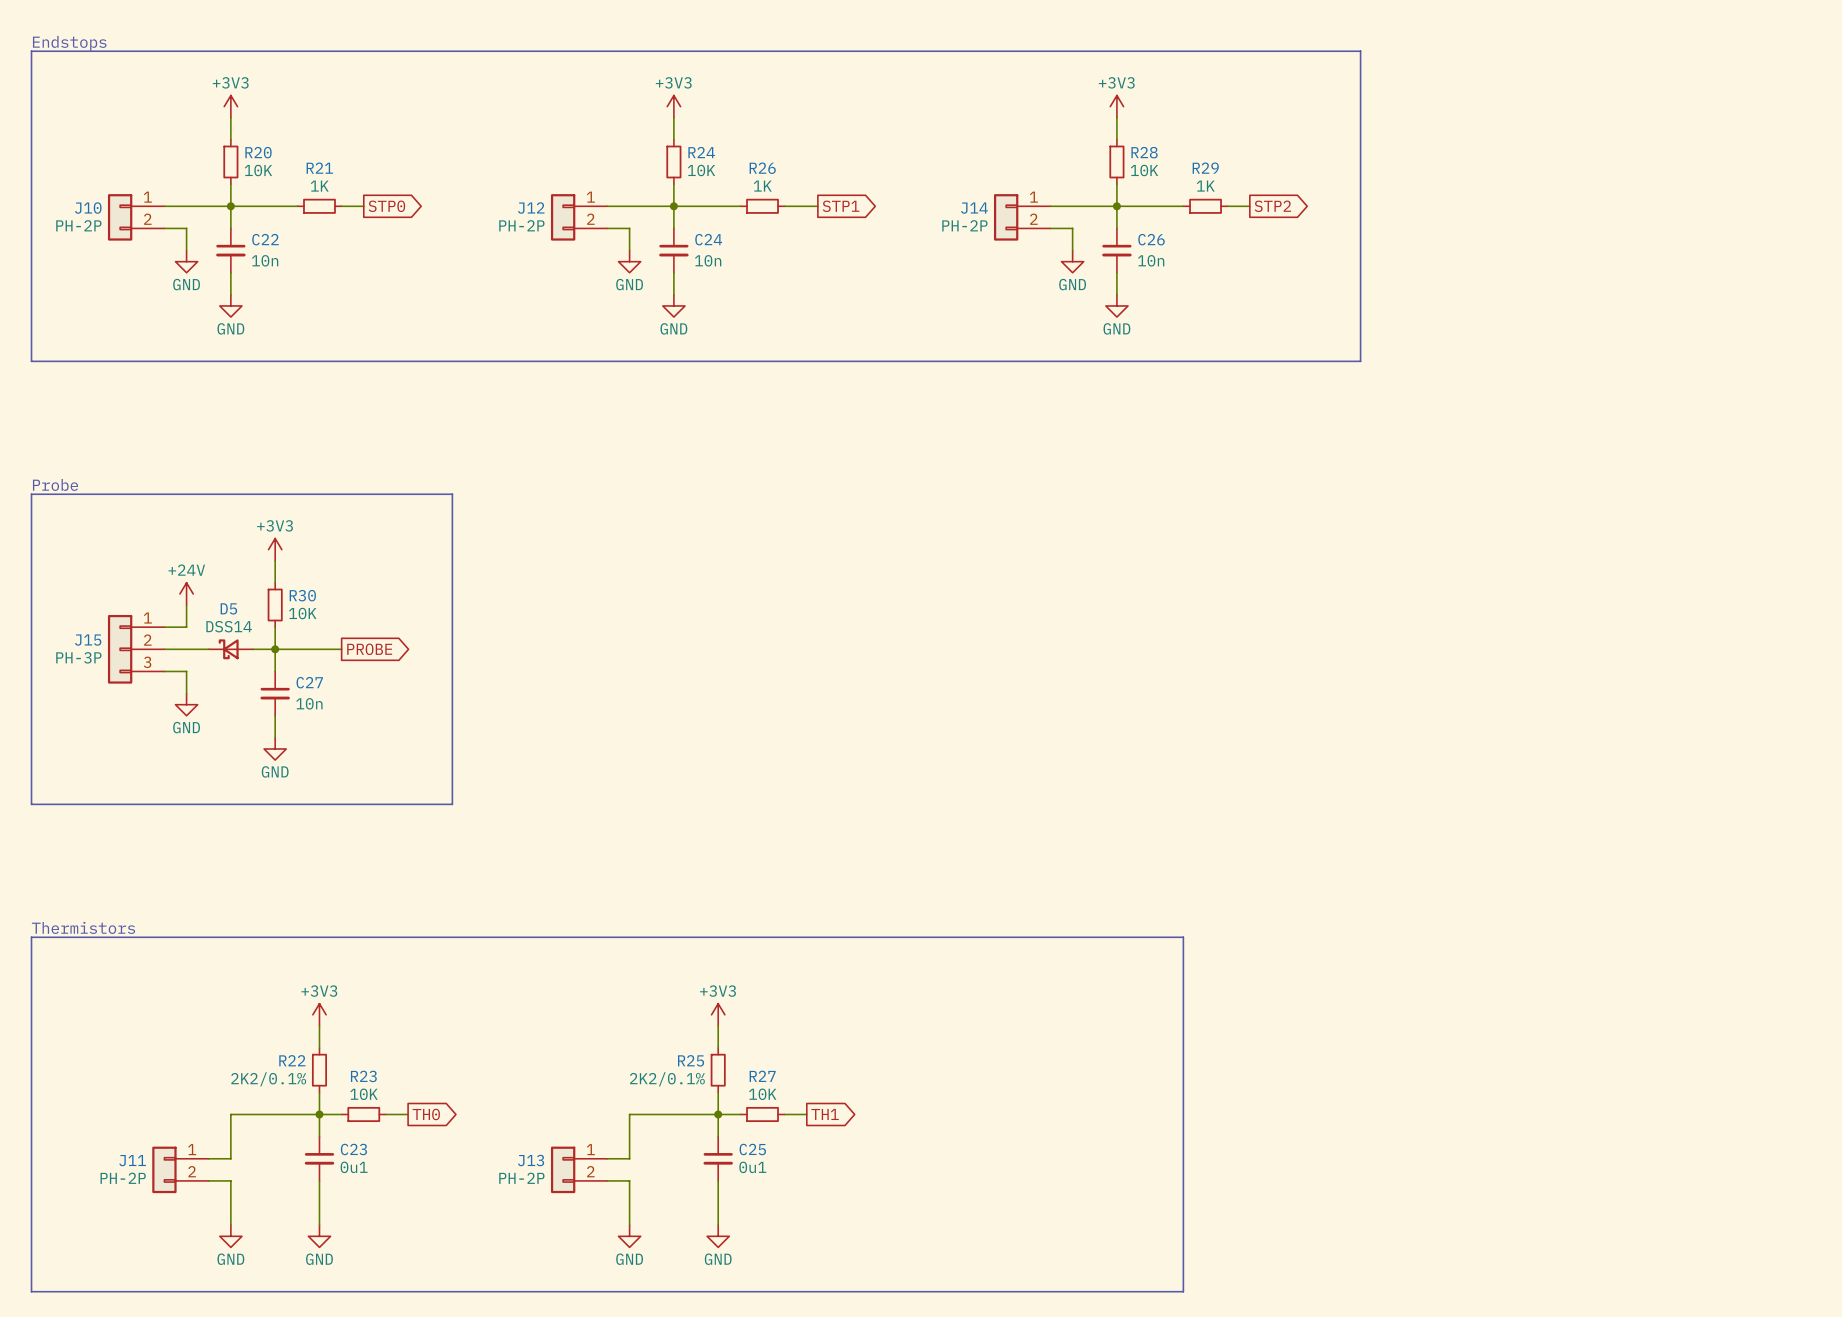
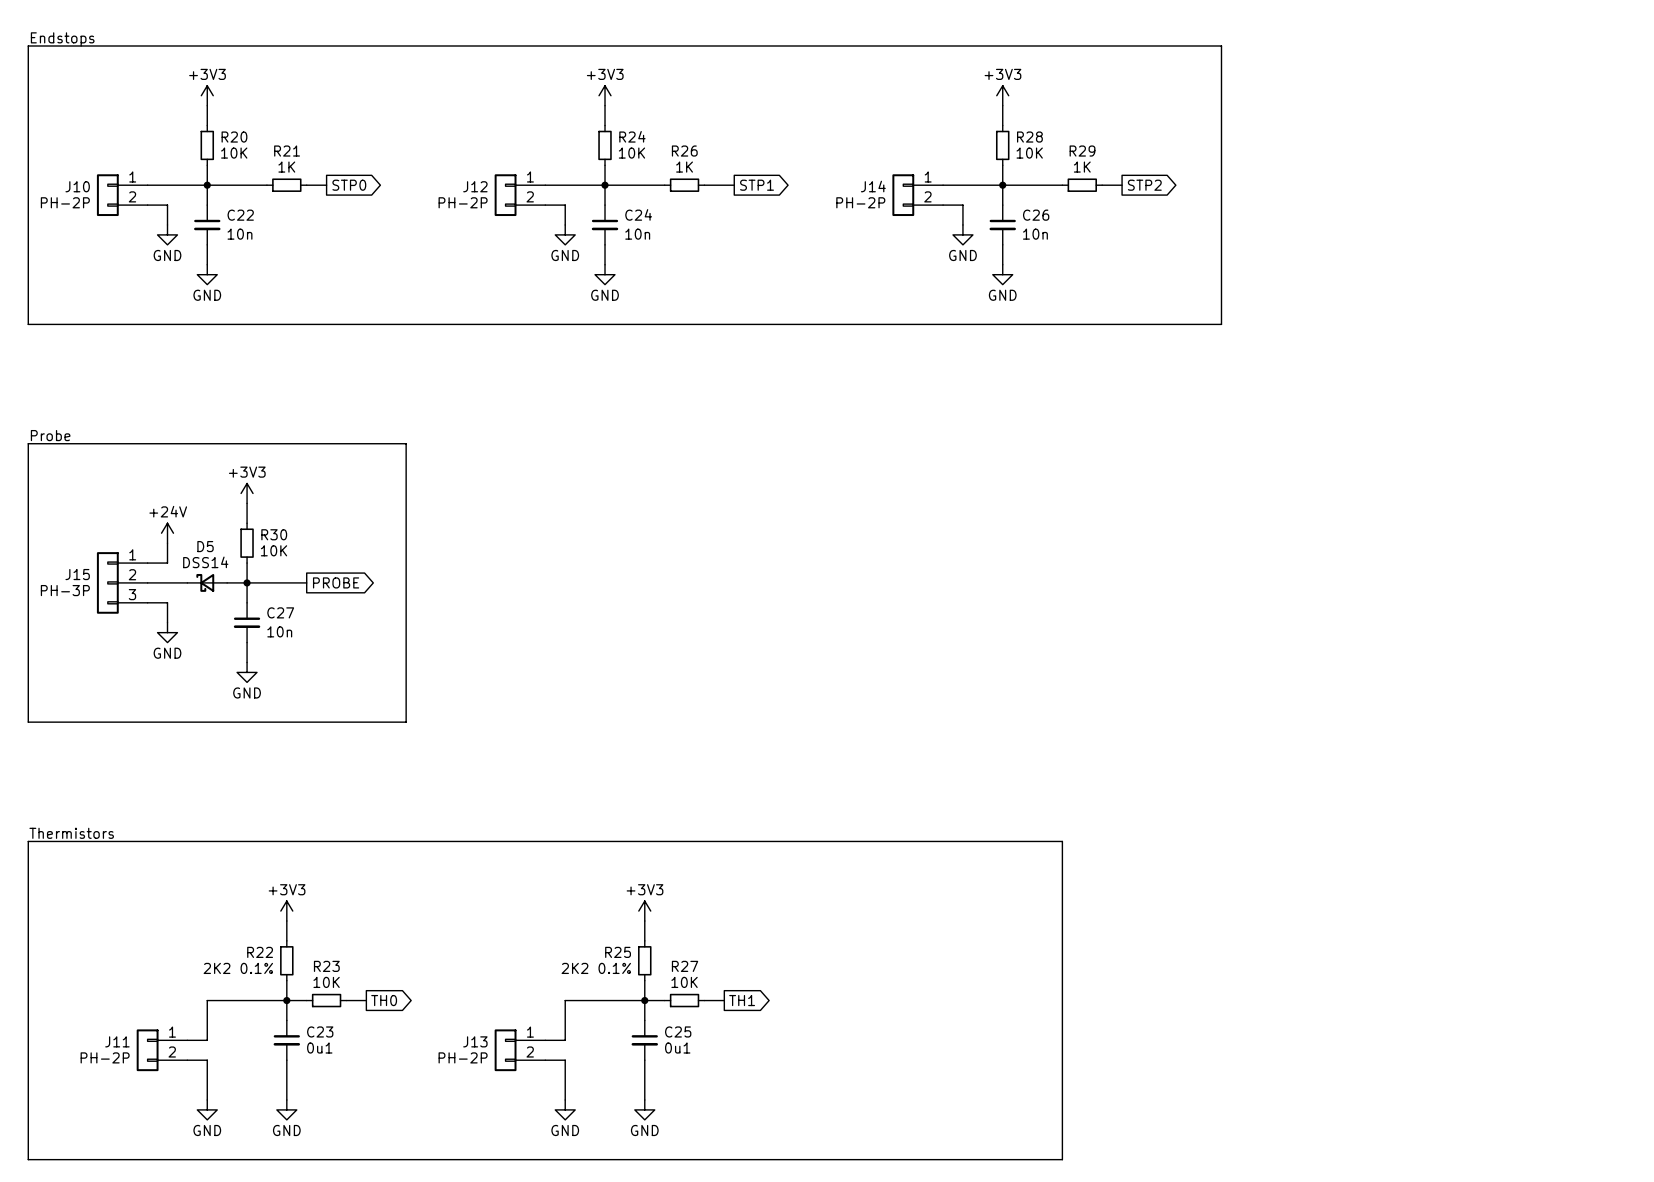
R22 value: 2K2/0.1% (268, 1079) -> 2K2 0.1% (238, 968)
R25 value: 2K2/0.1% (667, 1079) -> 2K2 0.1% (596, 968)

